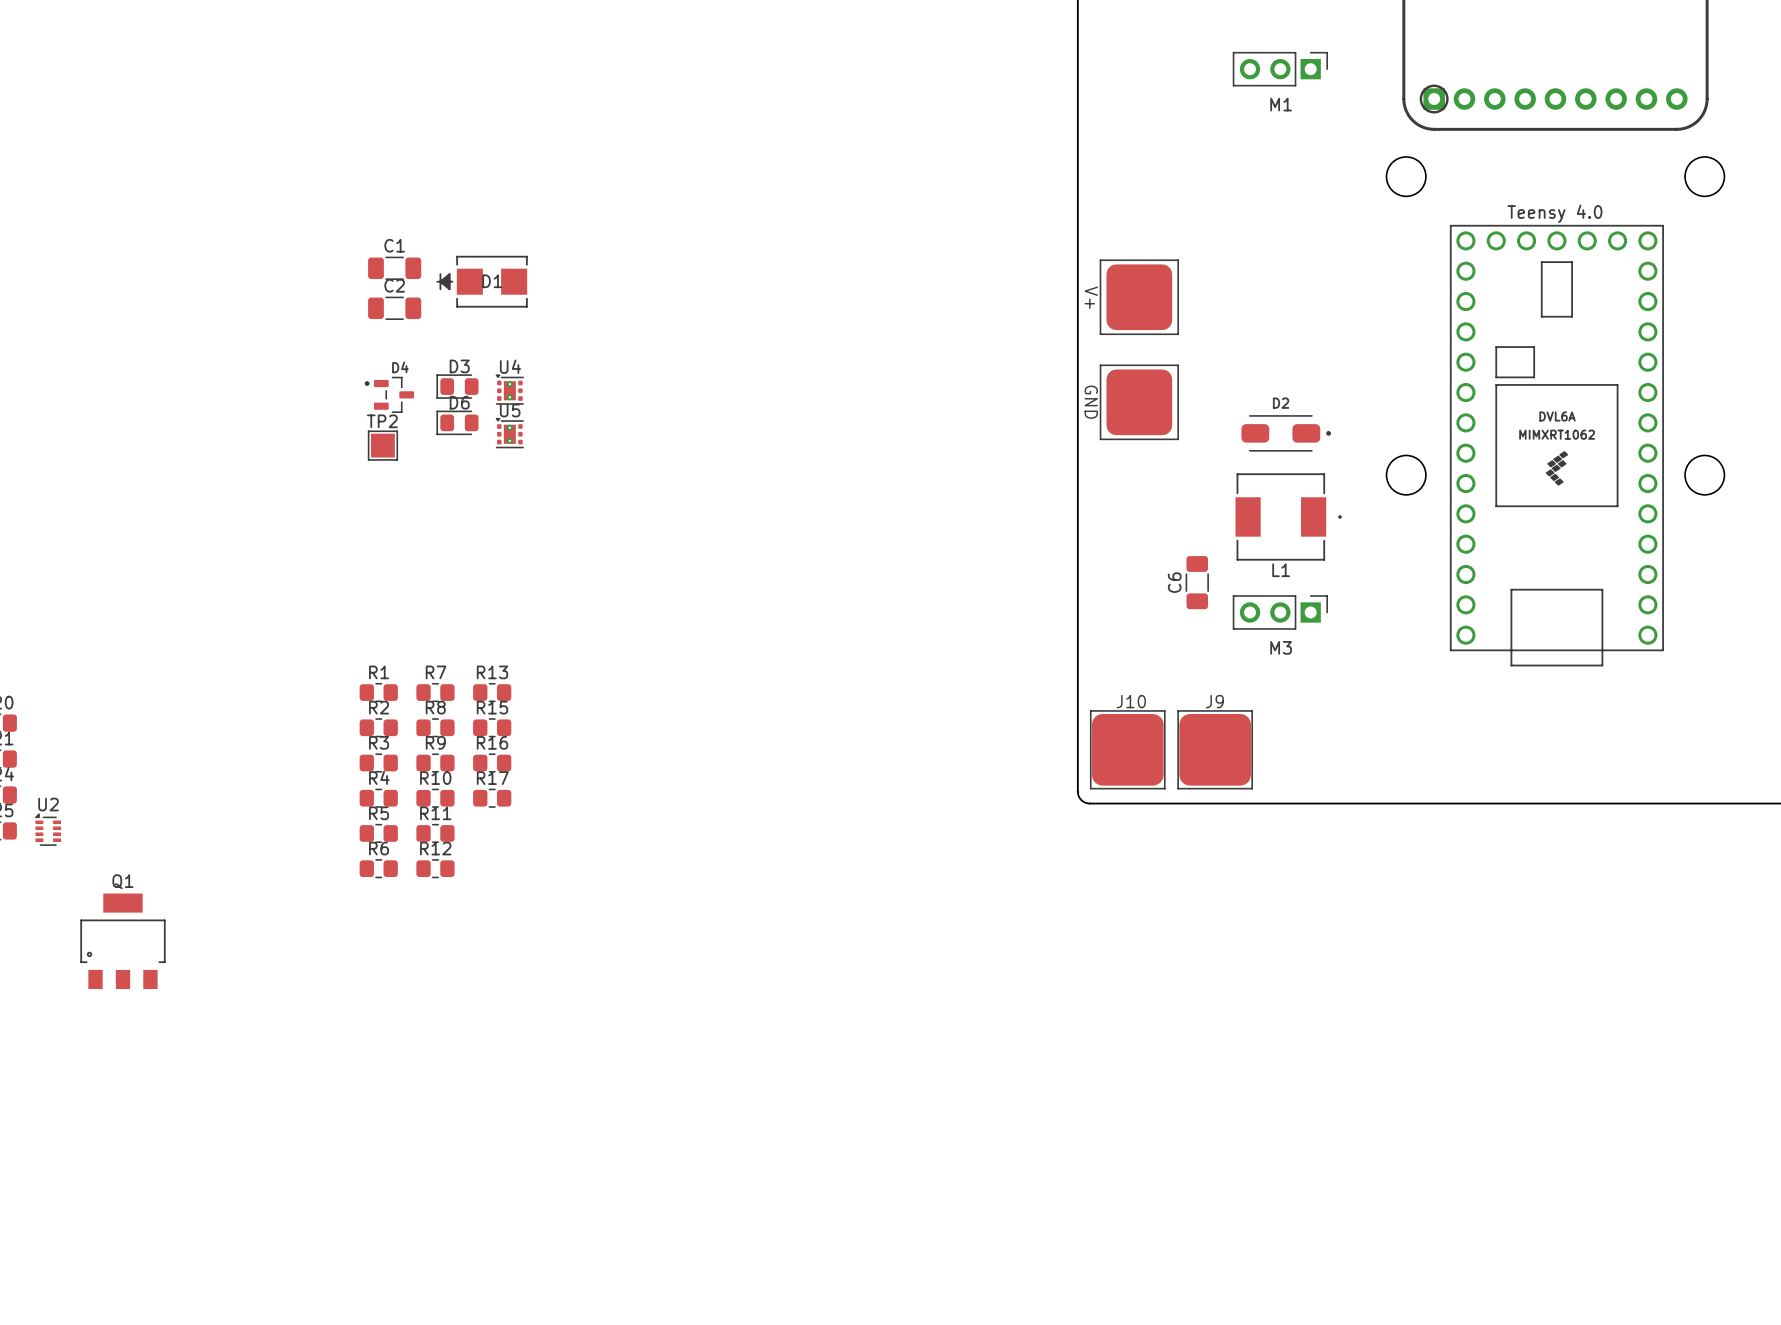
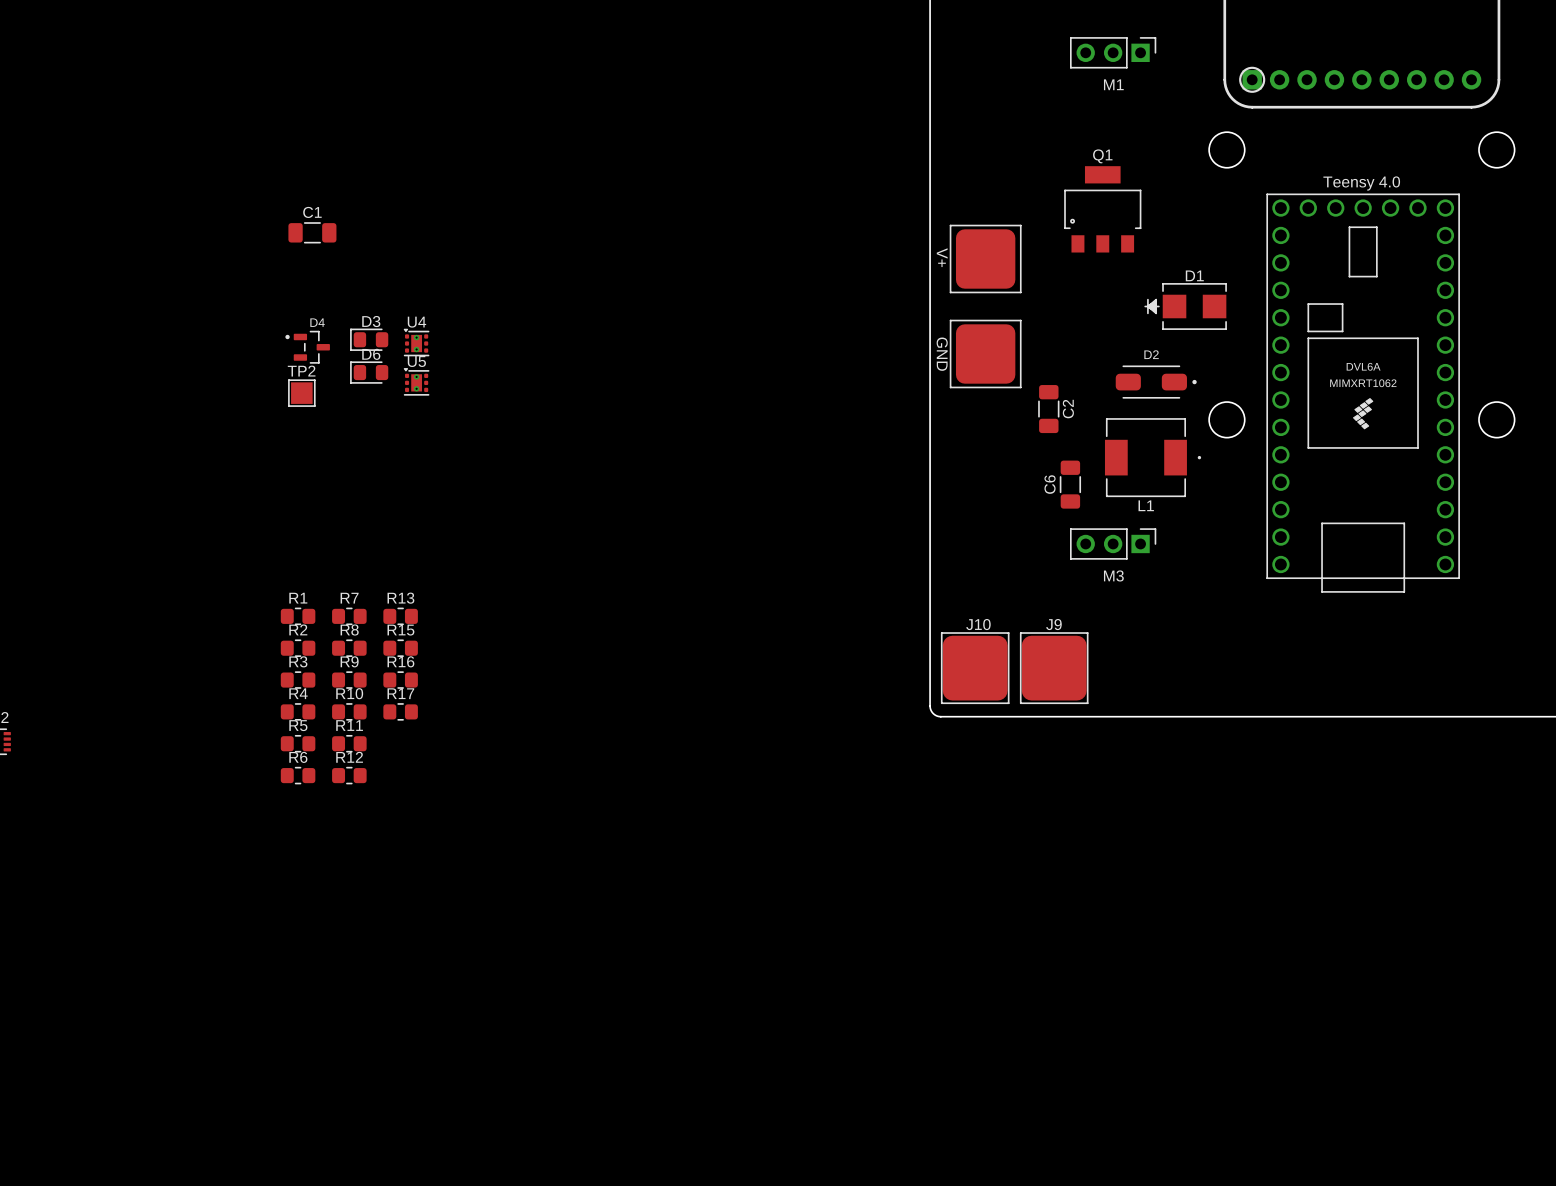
D1 position: (482, 281) -> (1185, 306)
D1 name position: D1 (492, 281) -> D1 (1194, 275)
C2 rotation: 0° (394, 308) -> 90° clockwise (1048, 409)
C2 position: (394, 308) -> (1048, 409)
D2 position: (1286, 433) -> (1156, 382)
L1 position: (1288, 516) -> (1153, 457)
C6 position: (1197, 582) -> (1070, 484)
Q1 position: (122, 941) -> (1102, 209)

